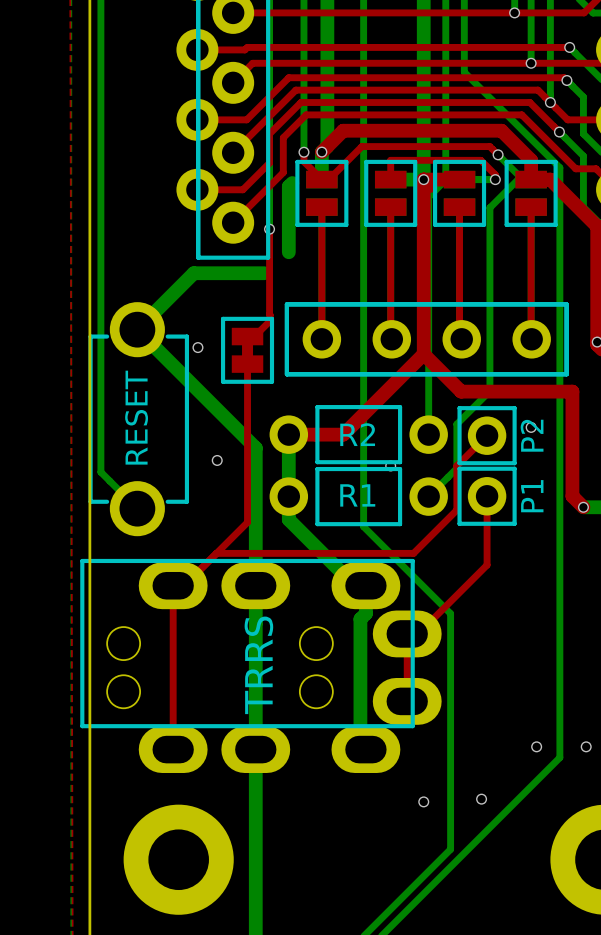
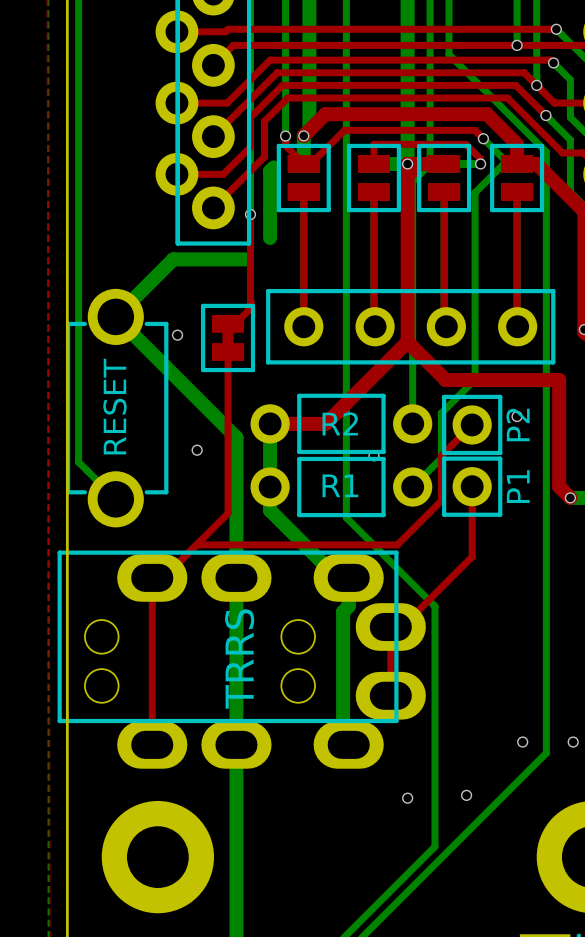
line: (286, 304) (566, 304) (566, 374) (286, 374) (286, 304) -> none

